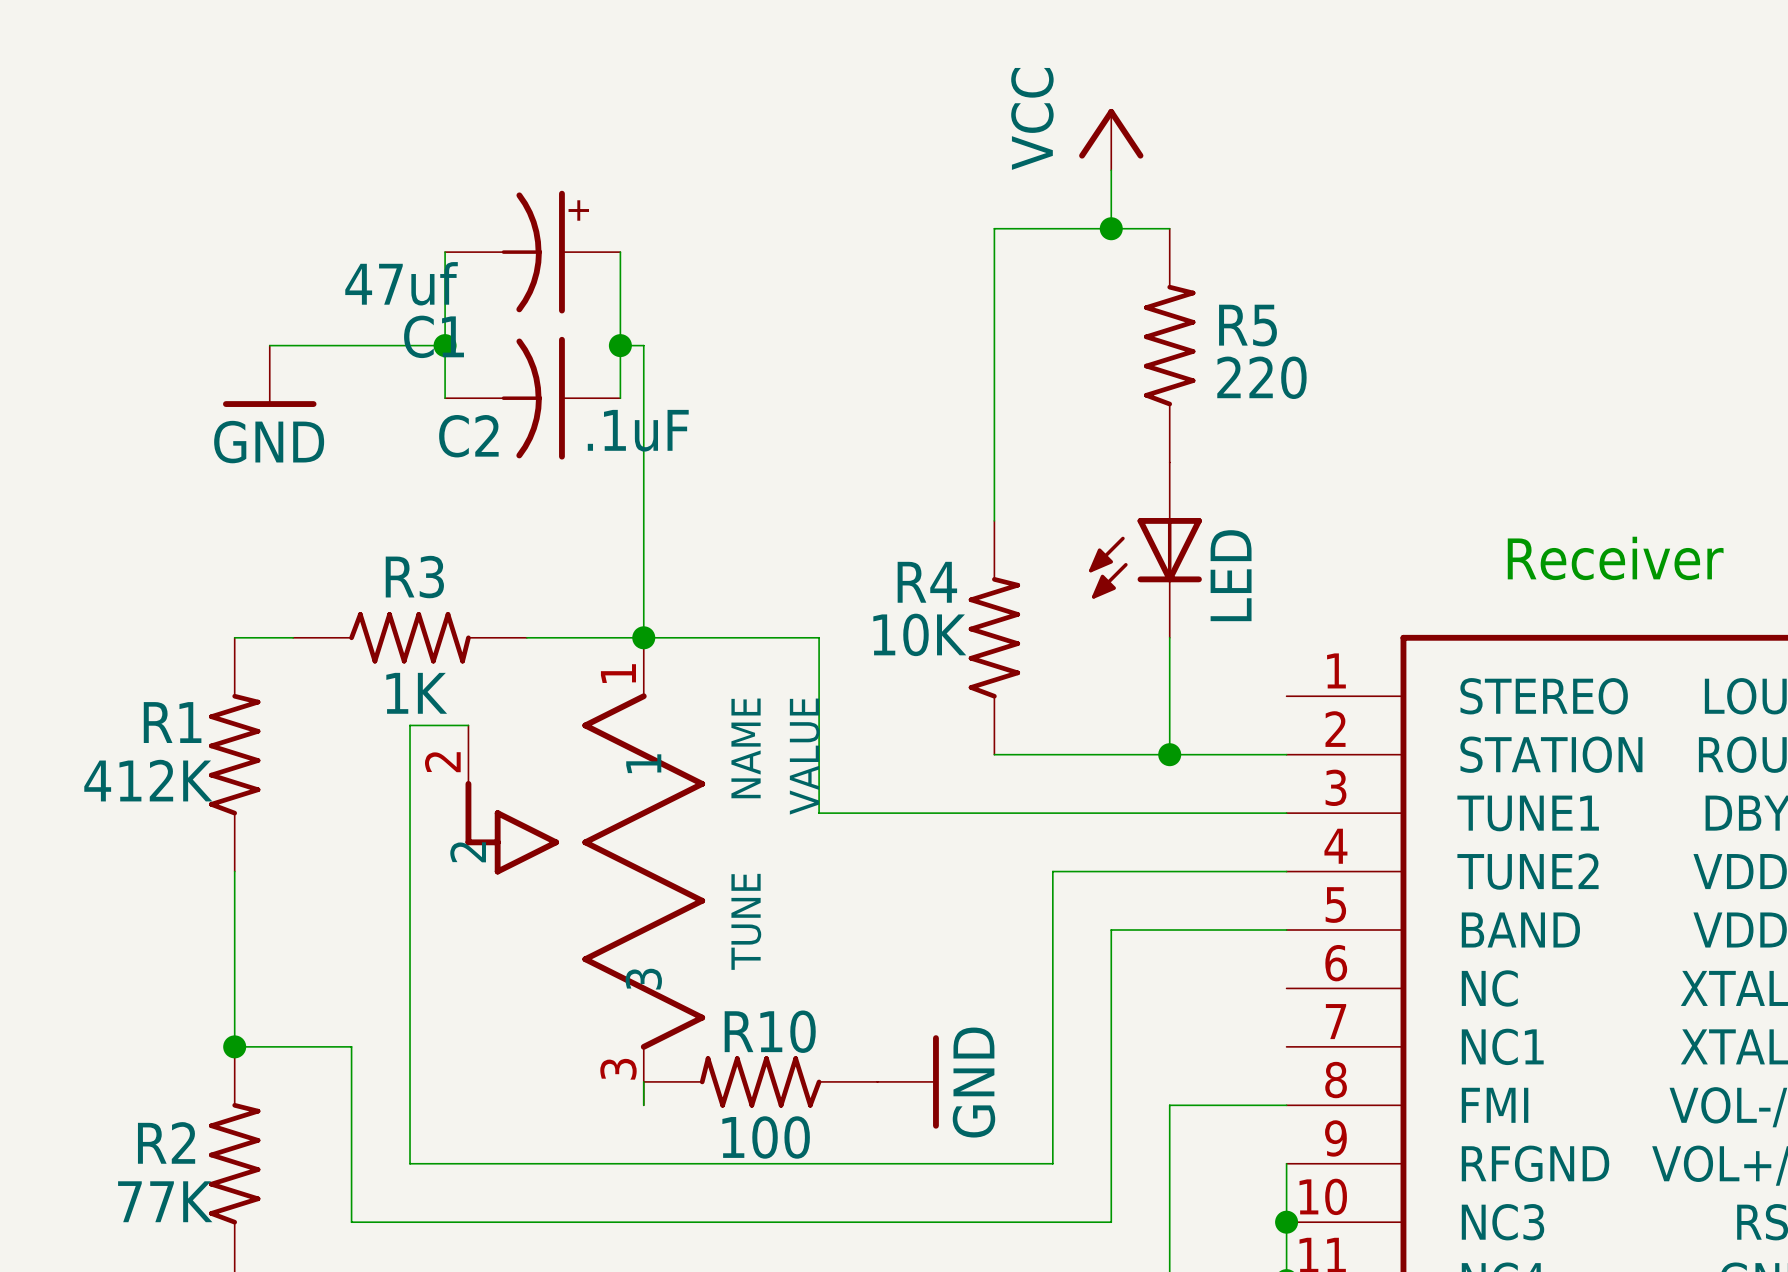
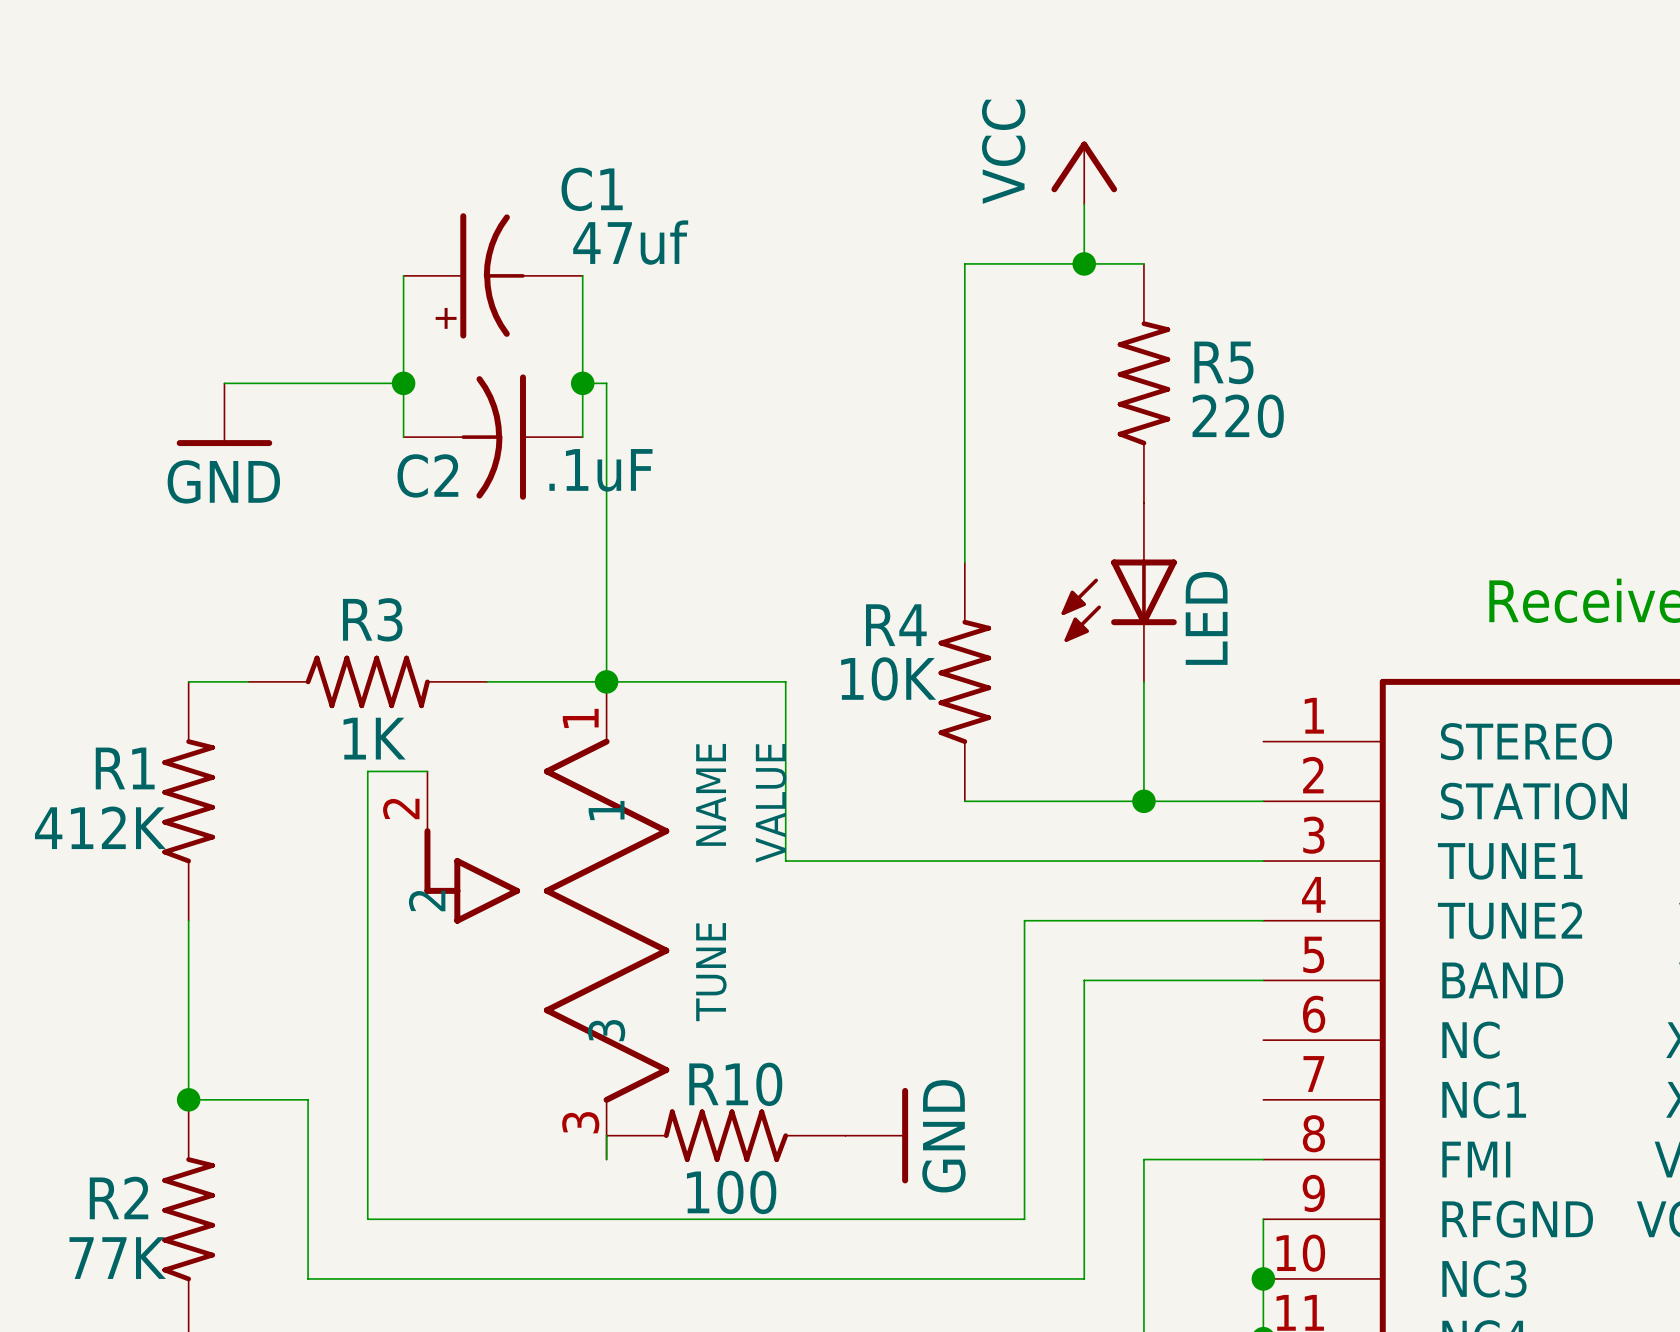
wire: none -> (403, 275) (403, 287)
wire: none -> (582, 275) (582, 287)
C1 rotation: 0° (545, 252) -> 180° (480, 275)

